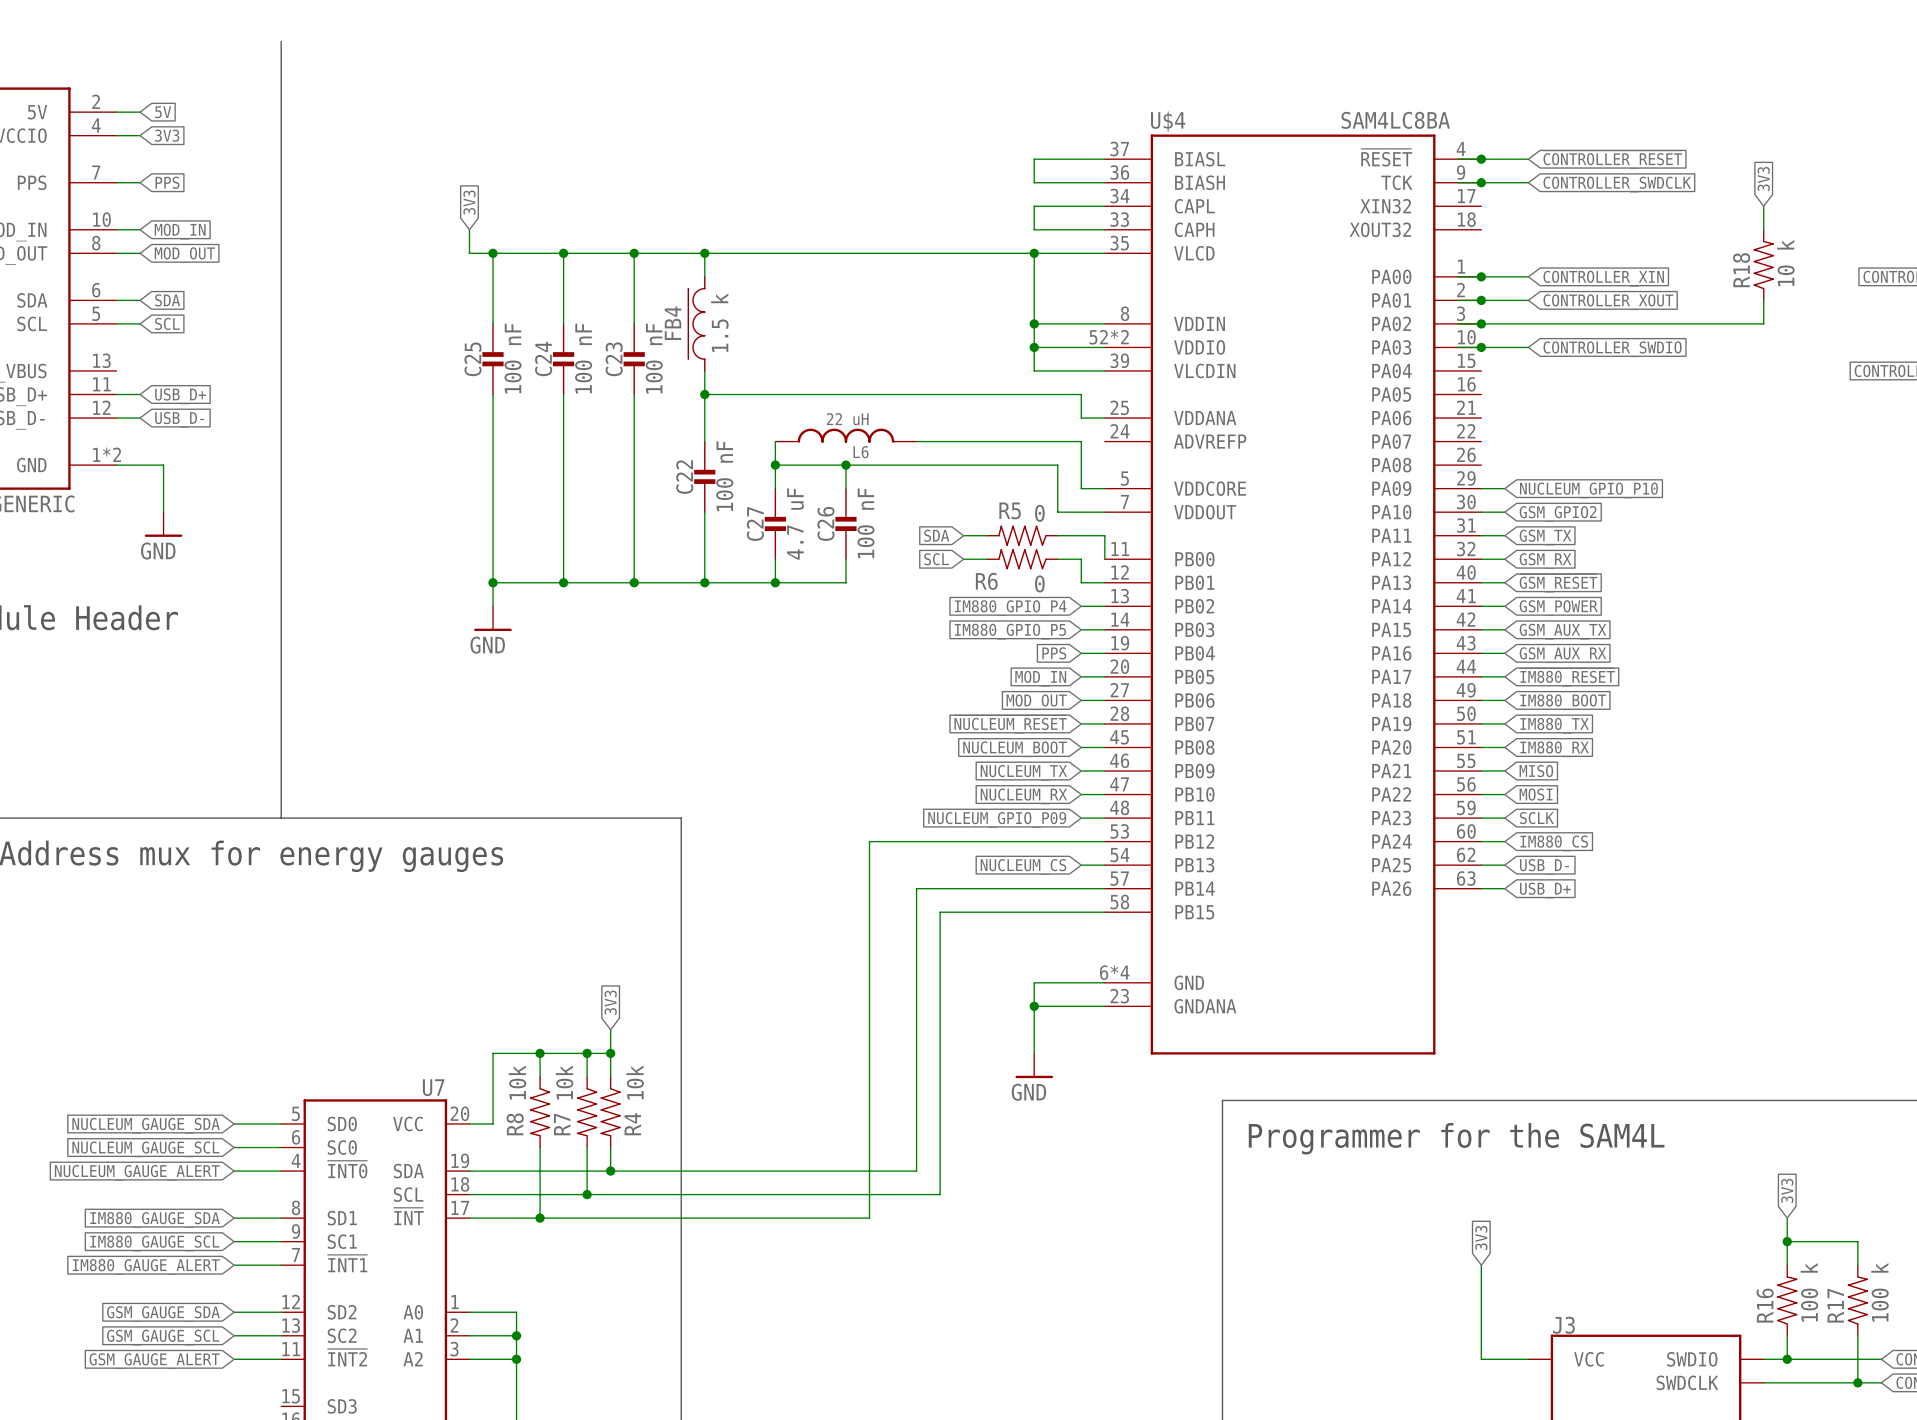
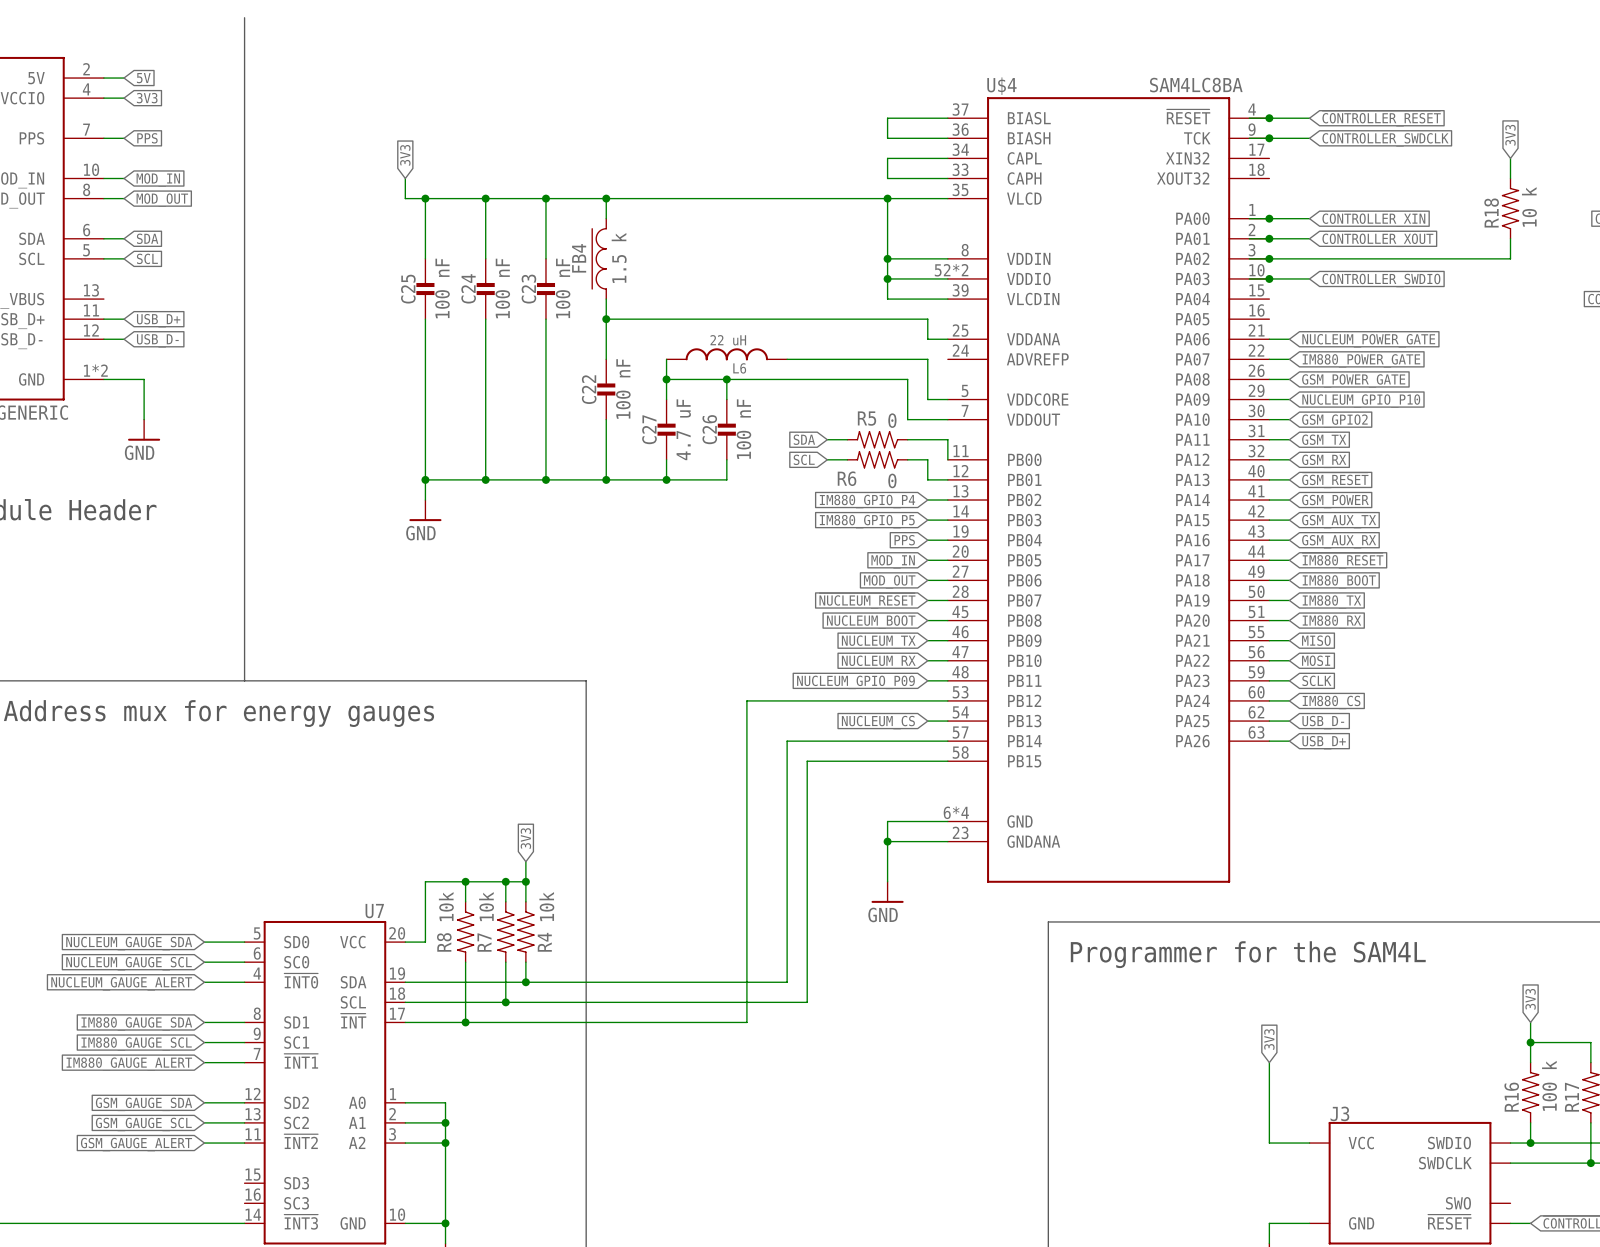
wire: none -> (1269, 339) (1289, 339)
global label: none -> NUCLEUM_POWER_GATE (1368, 340)
wire: none -> (1269, 359) (1289, 359)
global label: none -> IM880_POWER_GATE (1361, 360)
wire: none -> (1269, 379) (1289, 379)
global label: none -> GSM_POWER_GATE (1353, 380)

